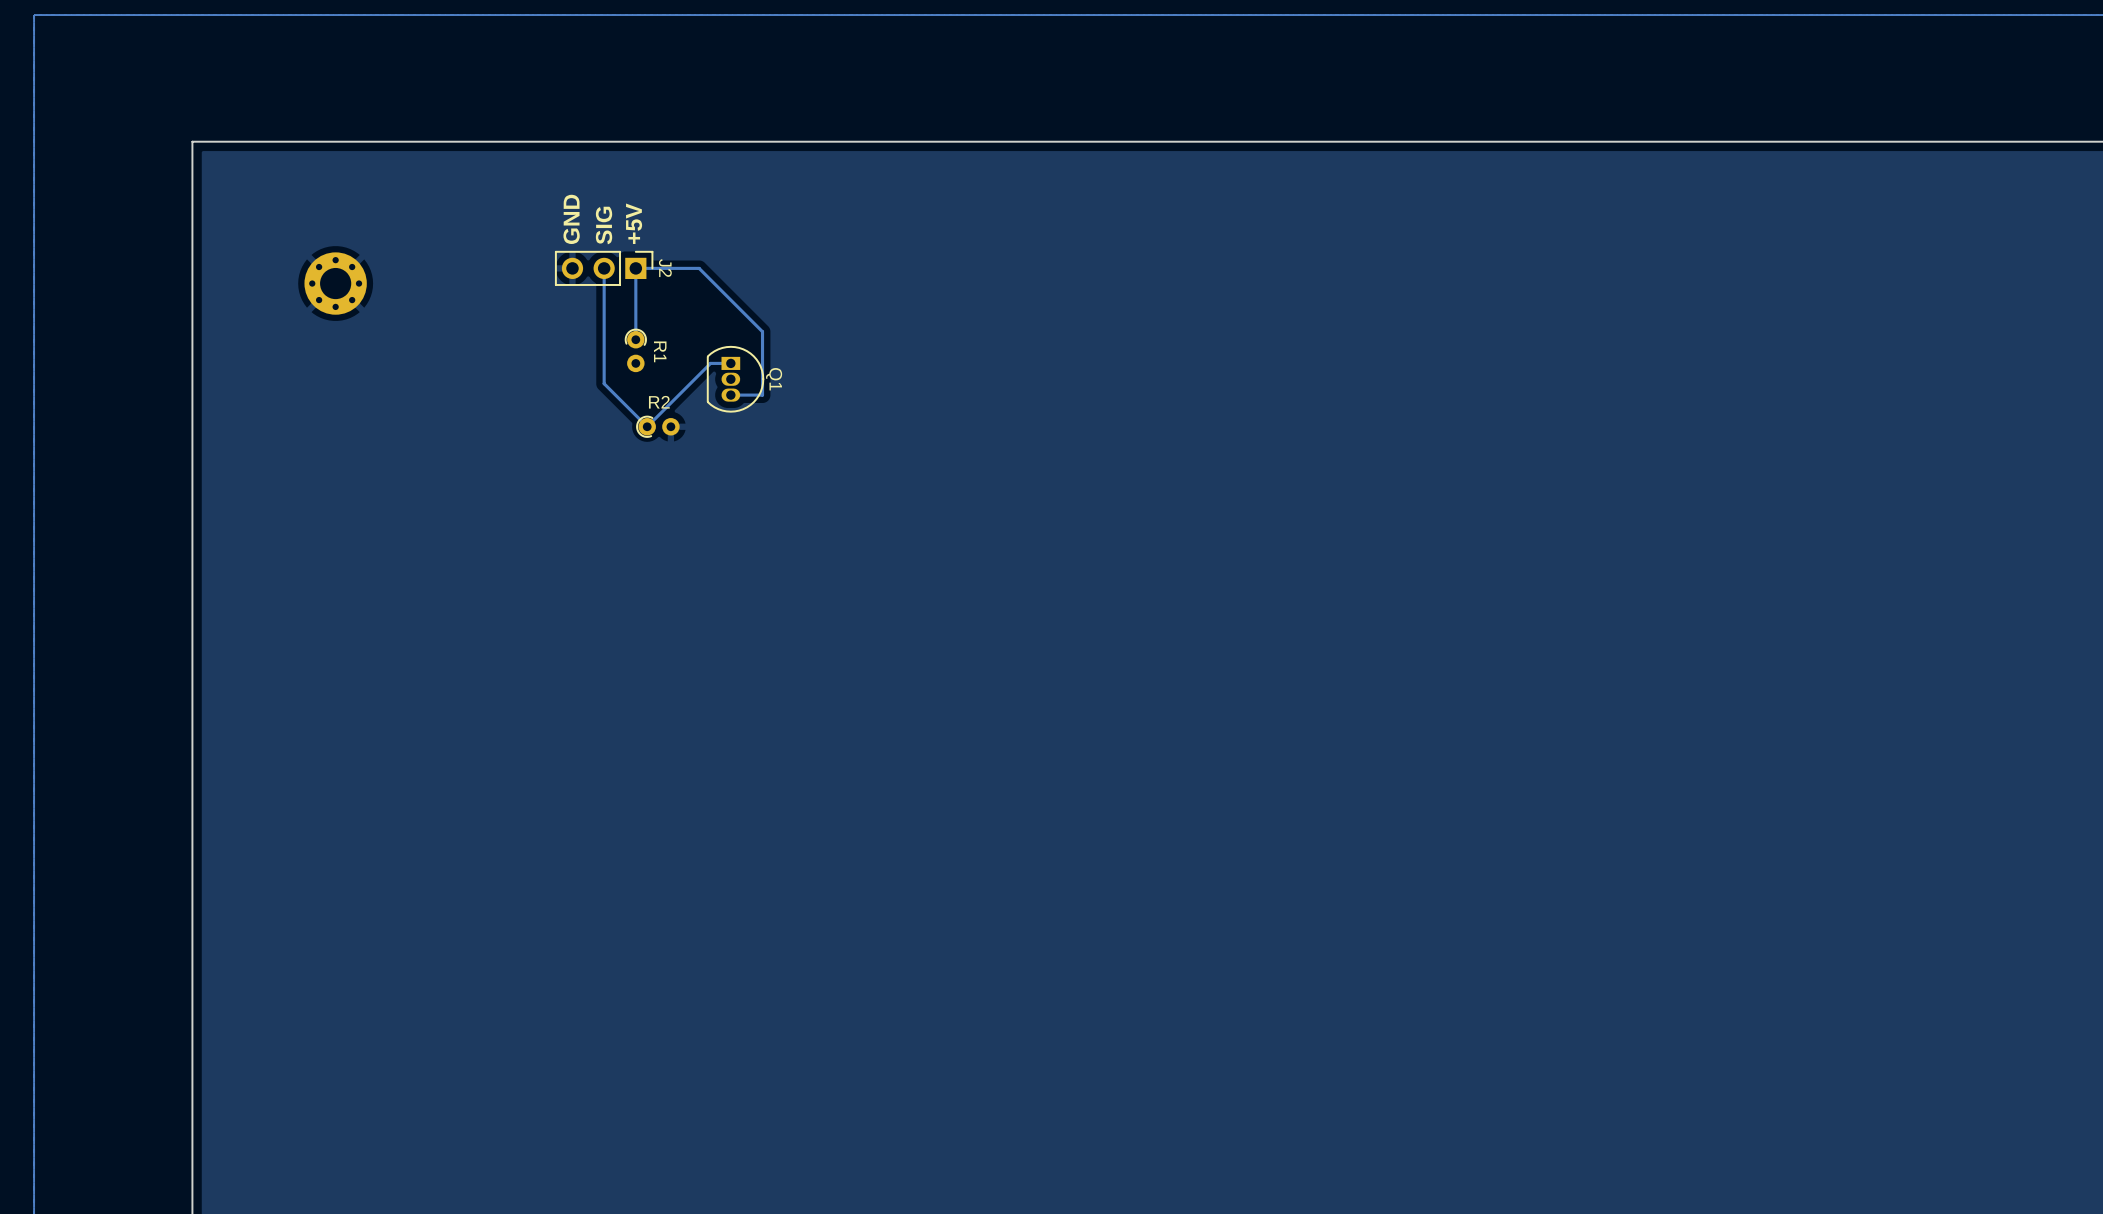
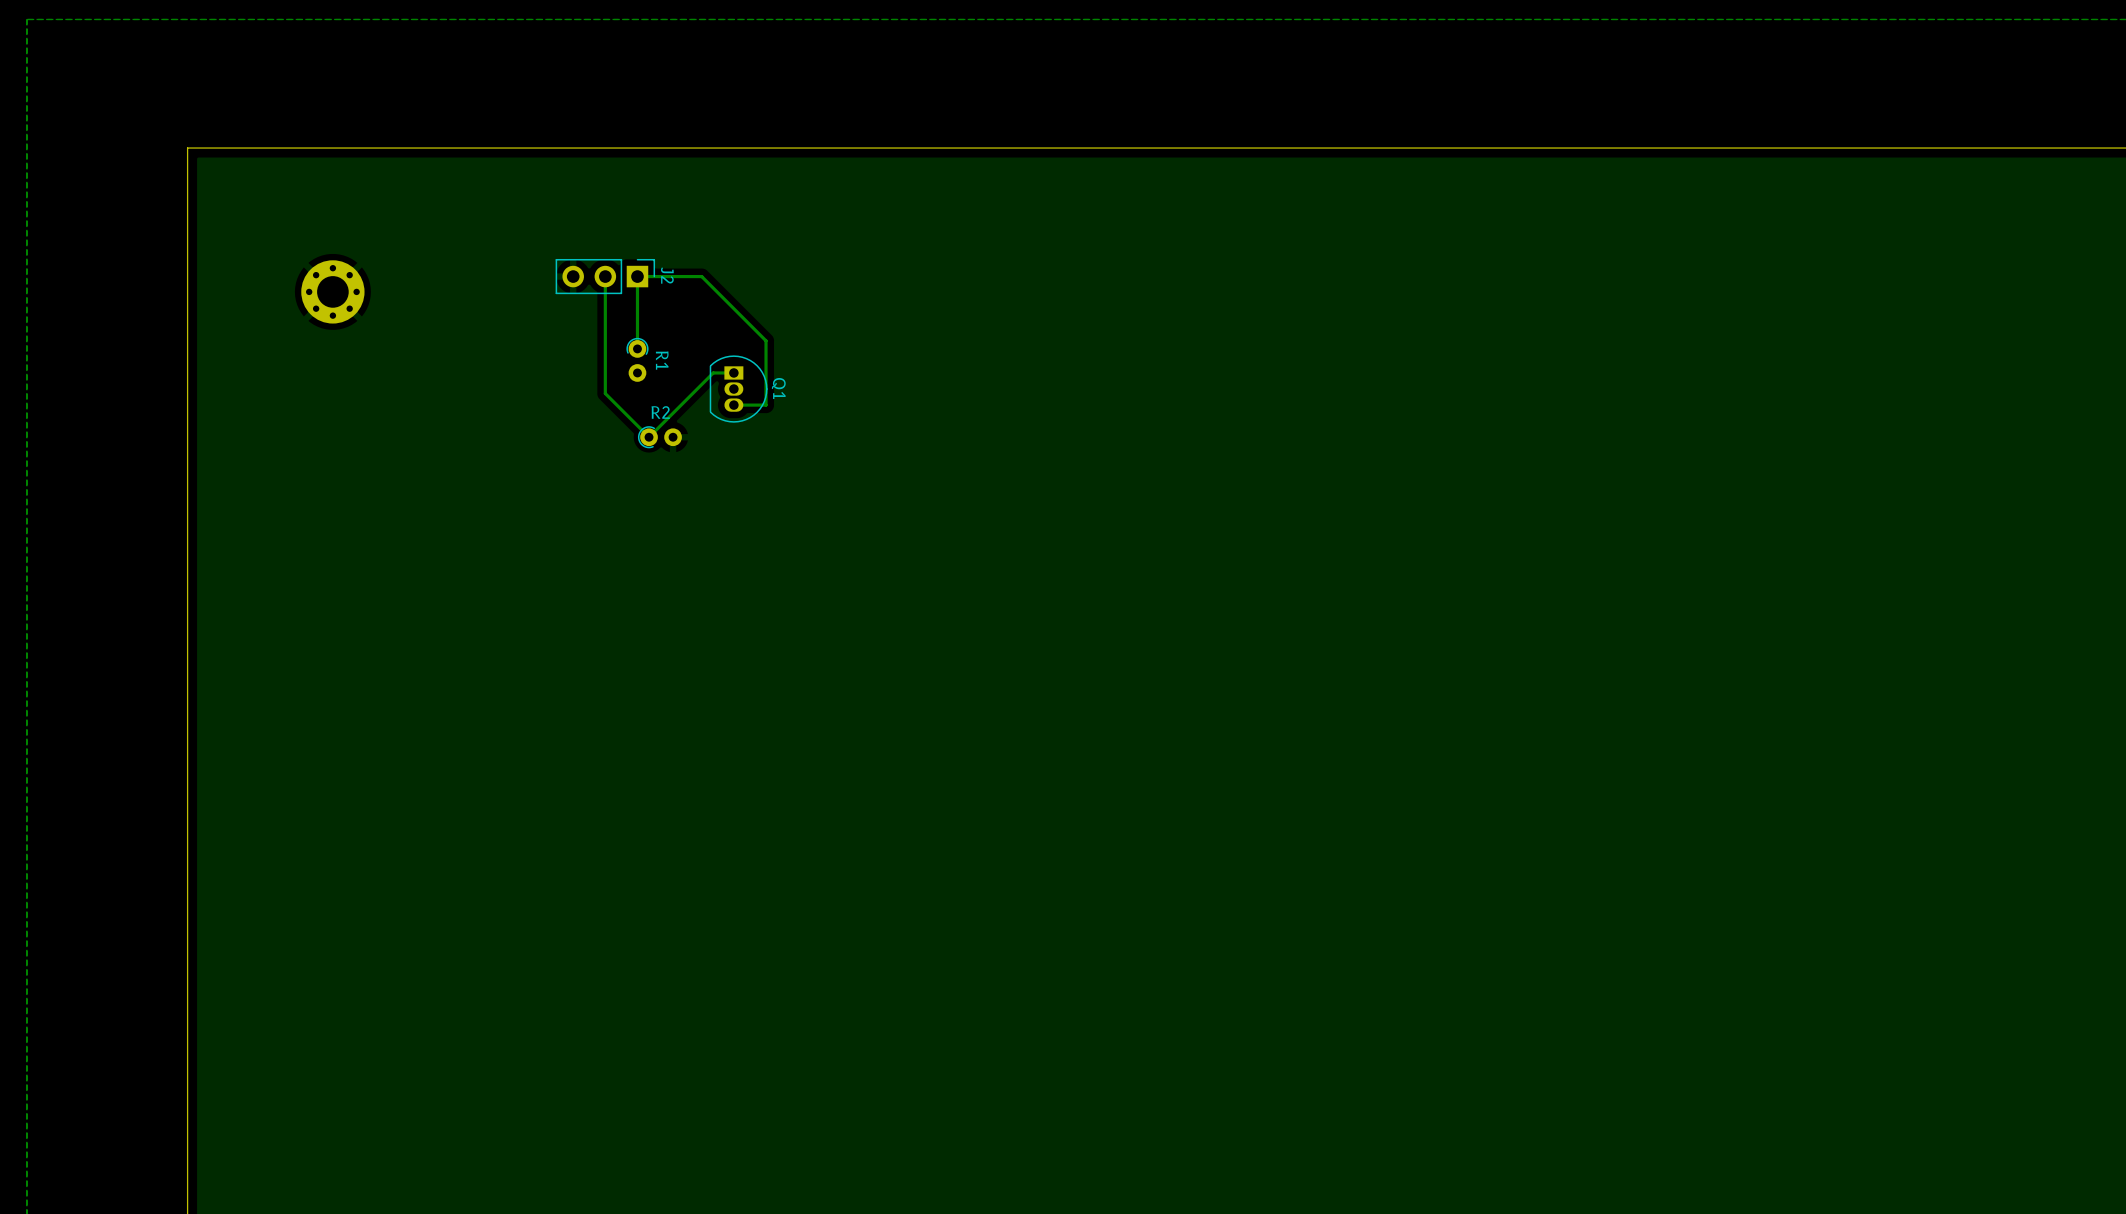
text: GND (571, 219) -> none
text: +5V (634, 223) -> none
text: SIG (604, 225) -> none

